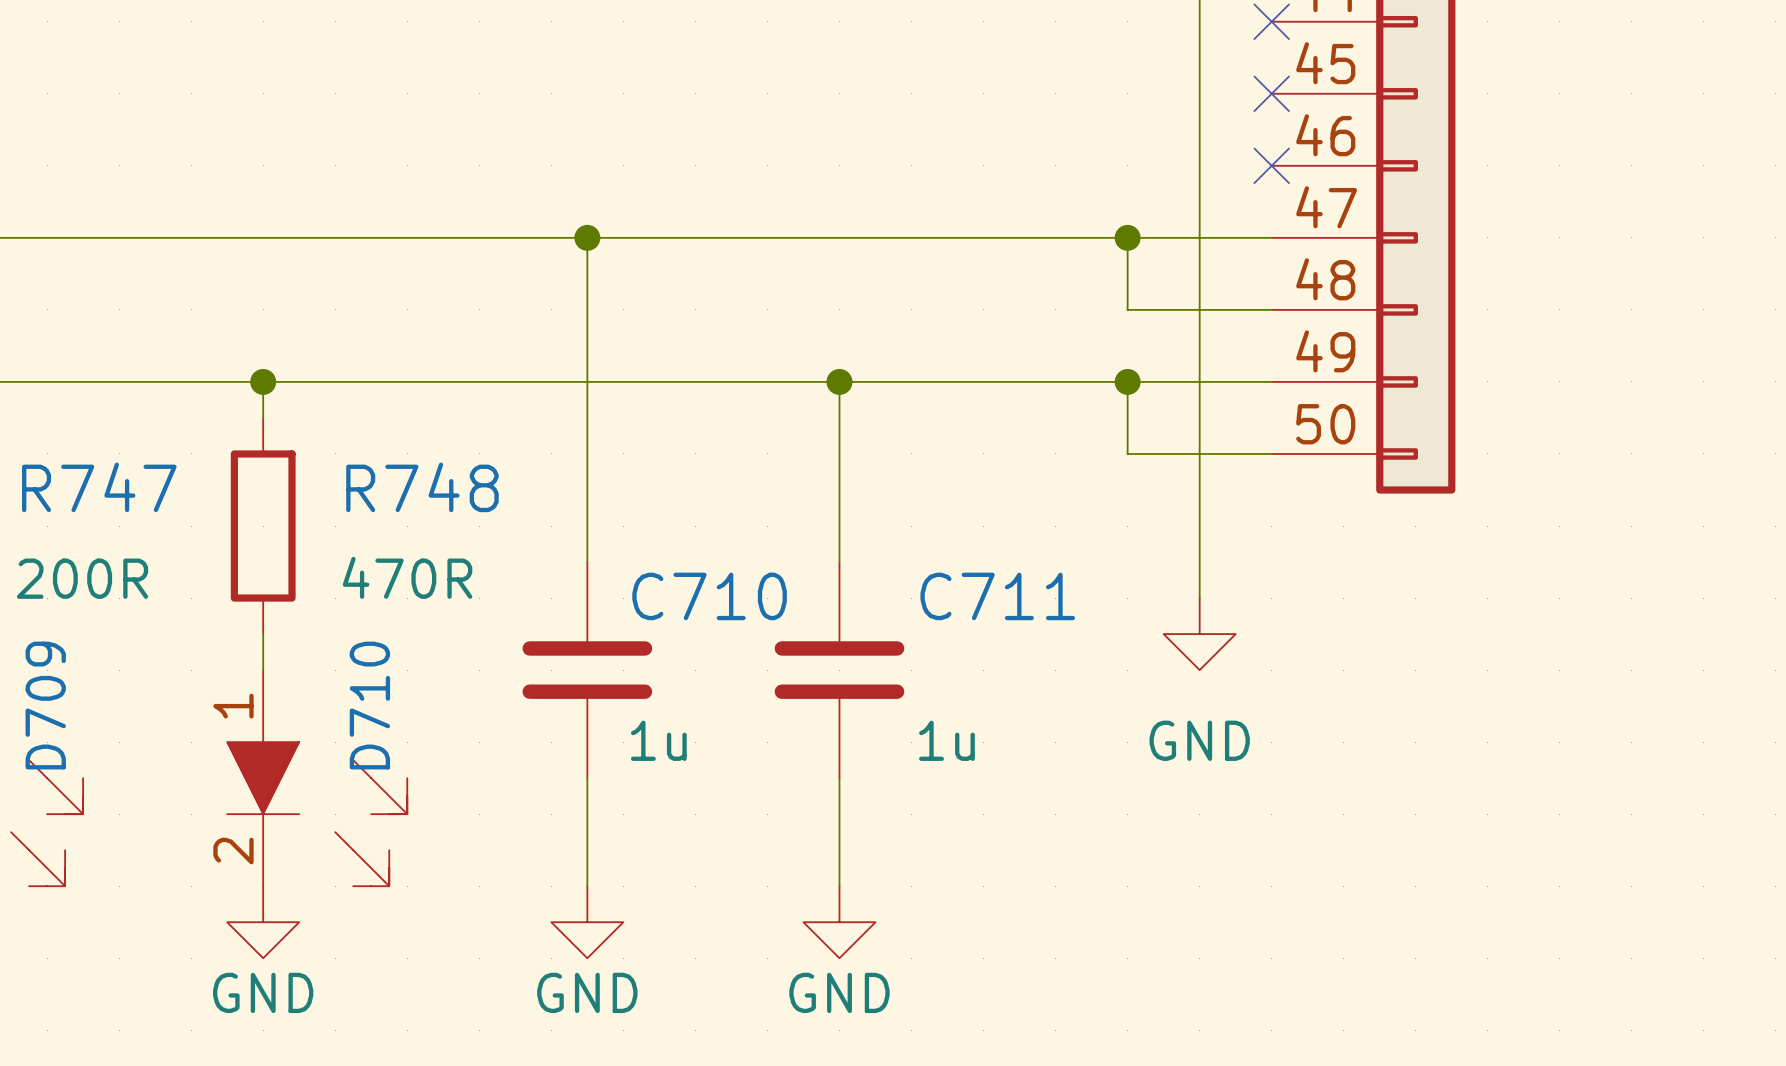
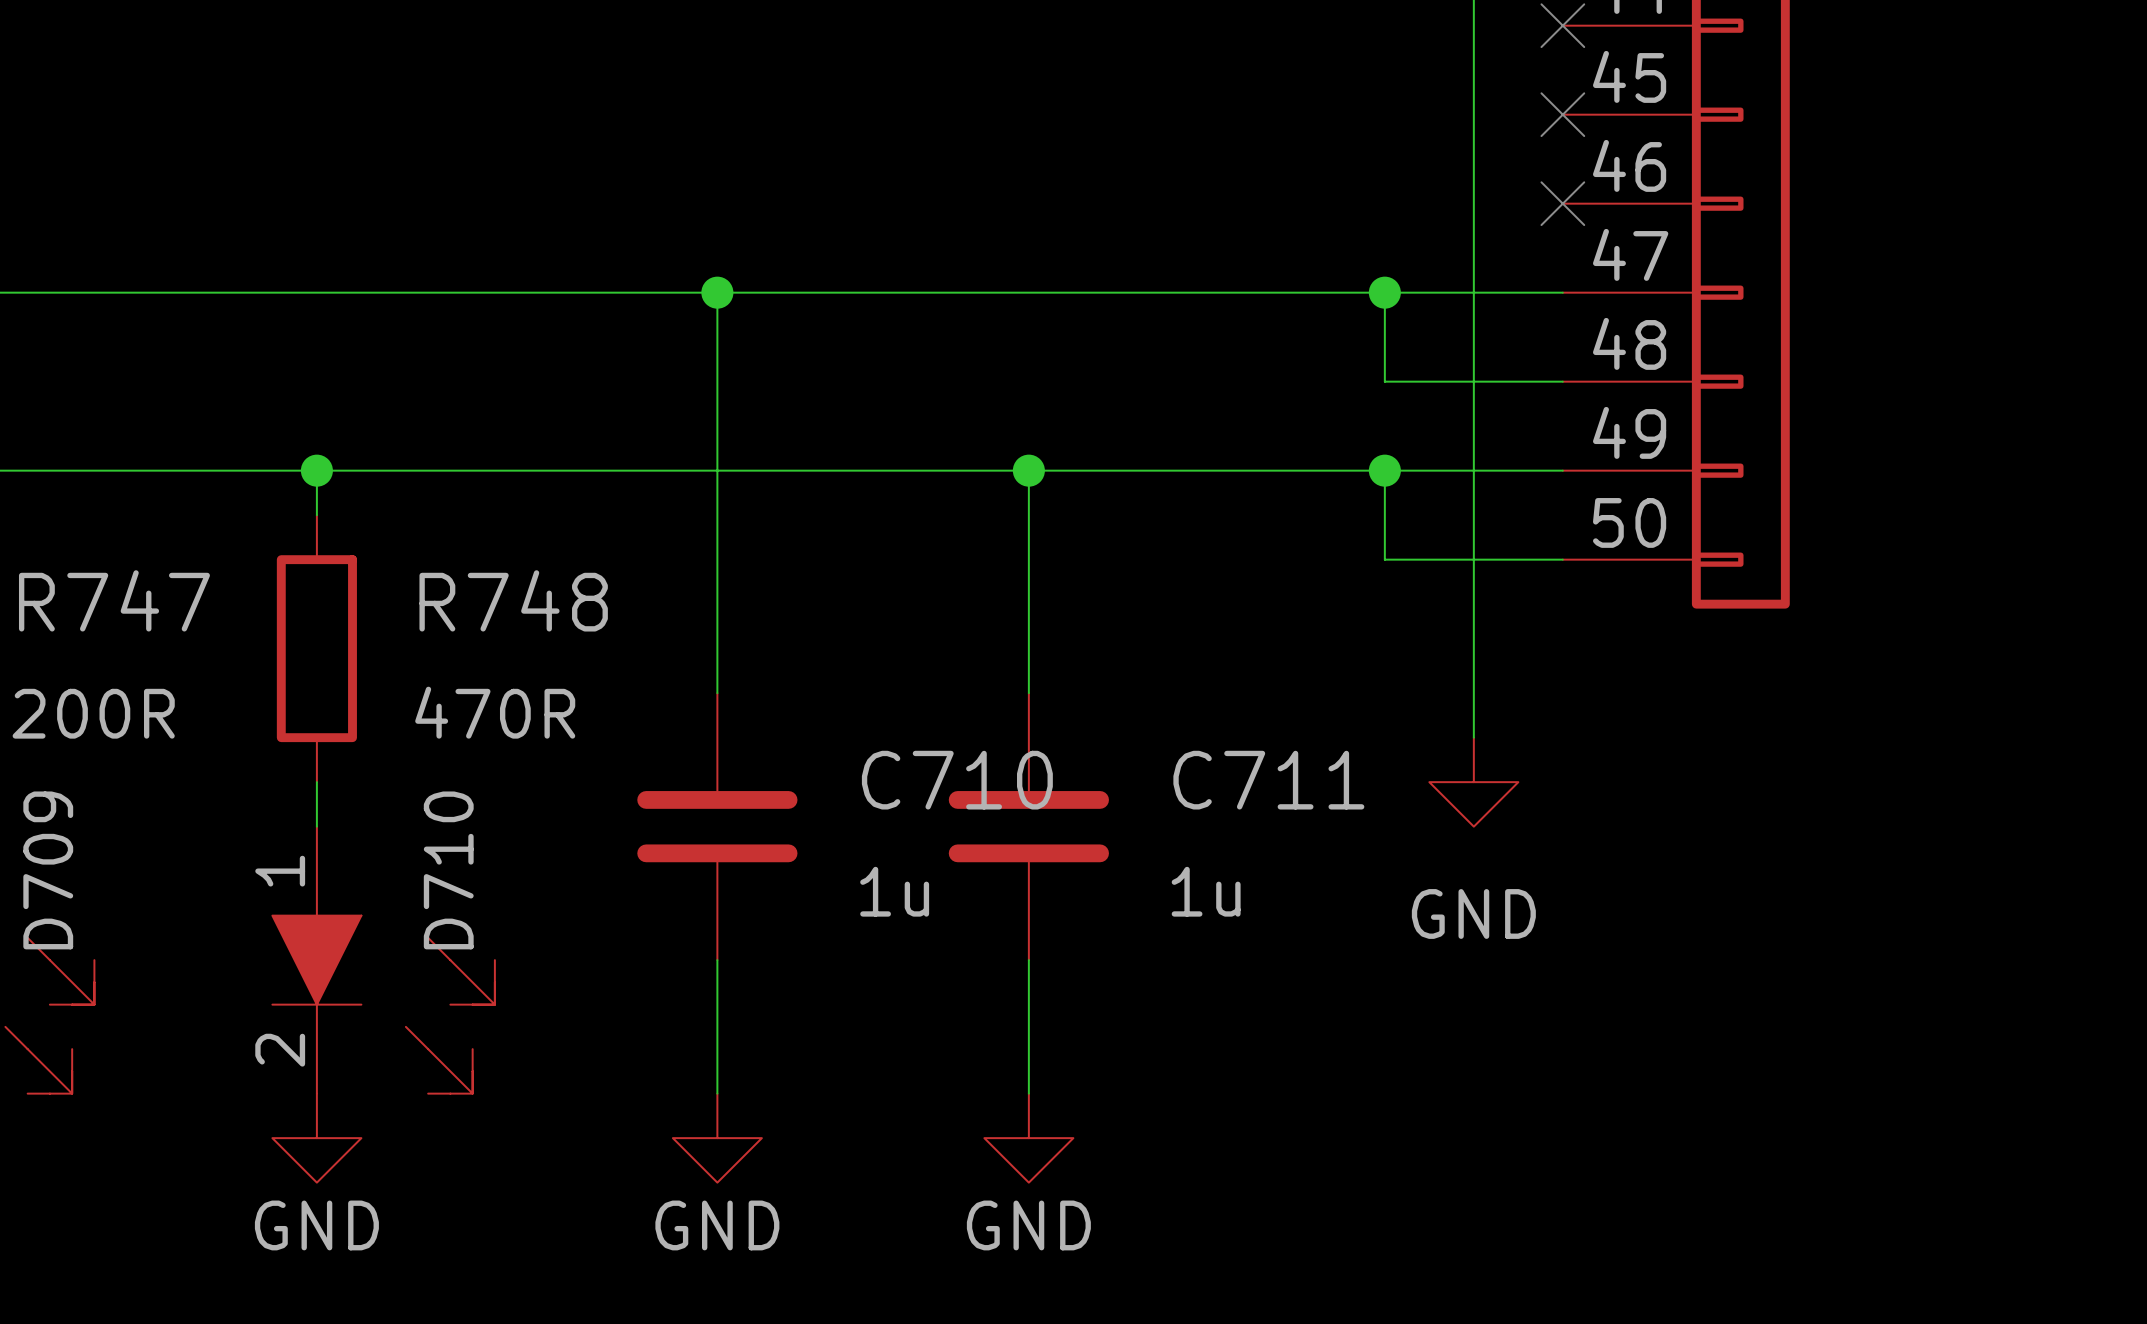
C710 name position: C710 (709, 596) -> C710 (957, 780)
C711 name position: C711 (997, 596) -> C711 (1268, 780)
C710 text position: 1u (658, 740) -> 1u (894, 891)
C711 text position: 1u (946, 740) -> 1u (1206, 891)

